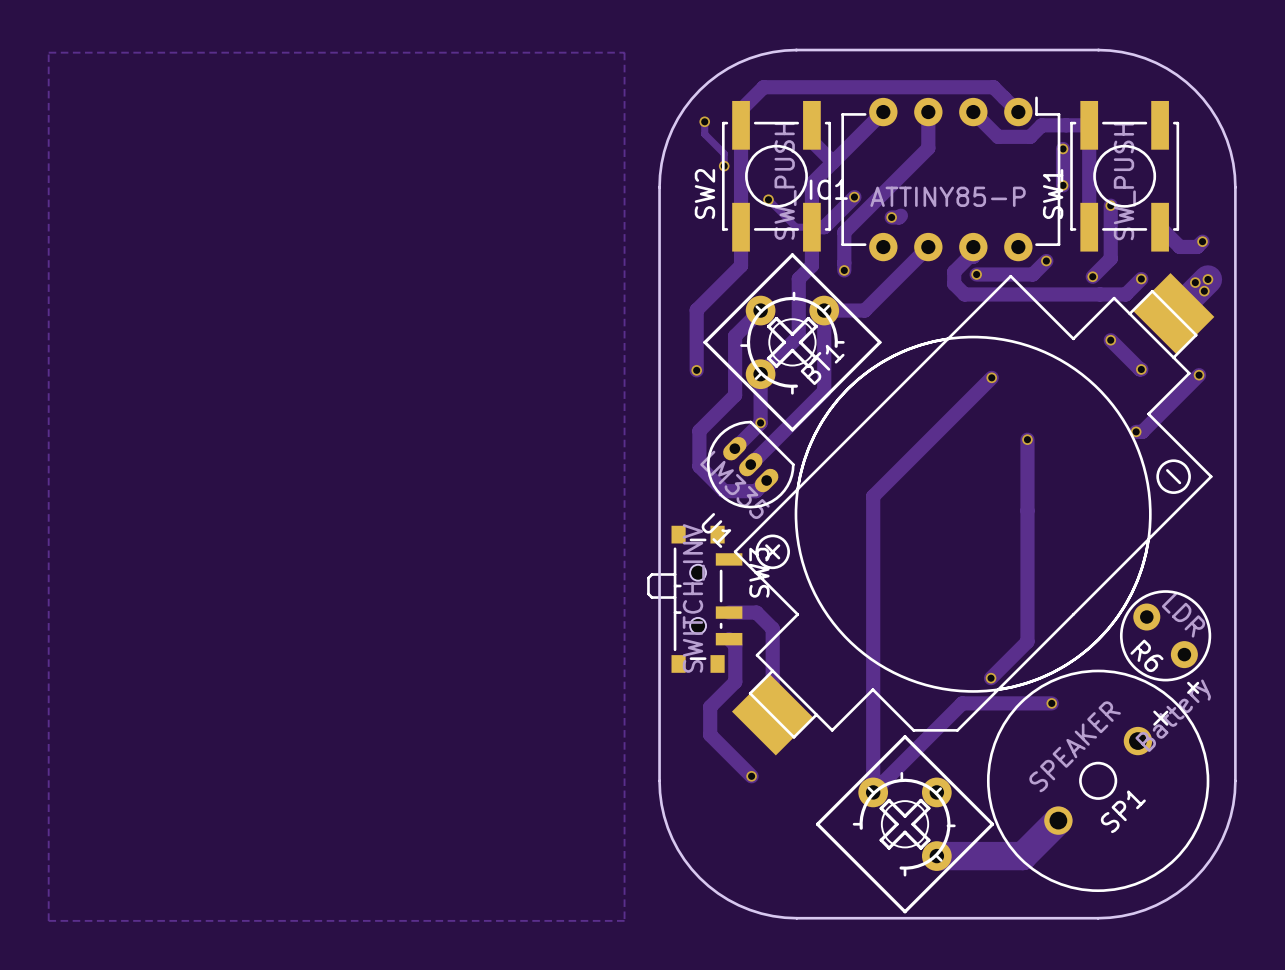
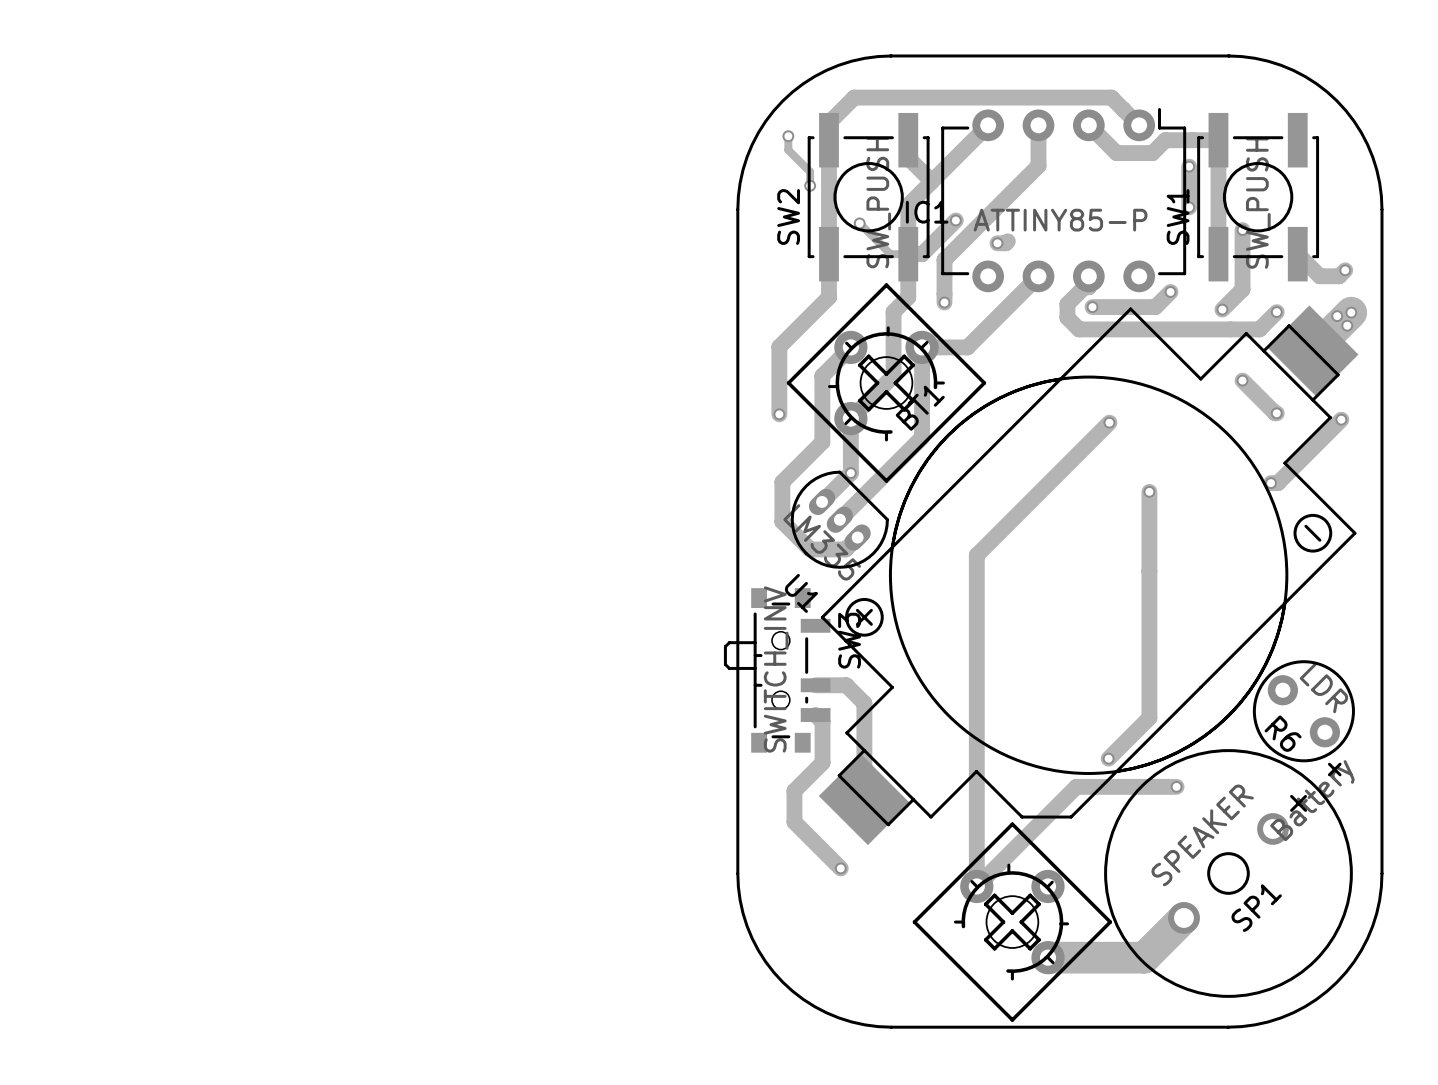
zone outline: (48, 52) (624, 52) (624, 920) (48, 920) (48, 52) -> none

